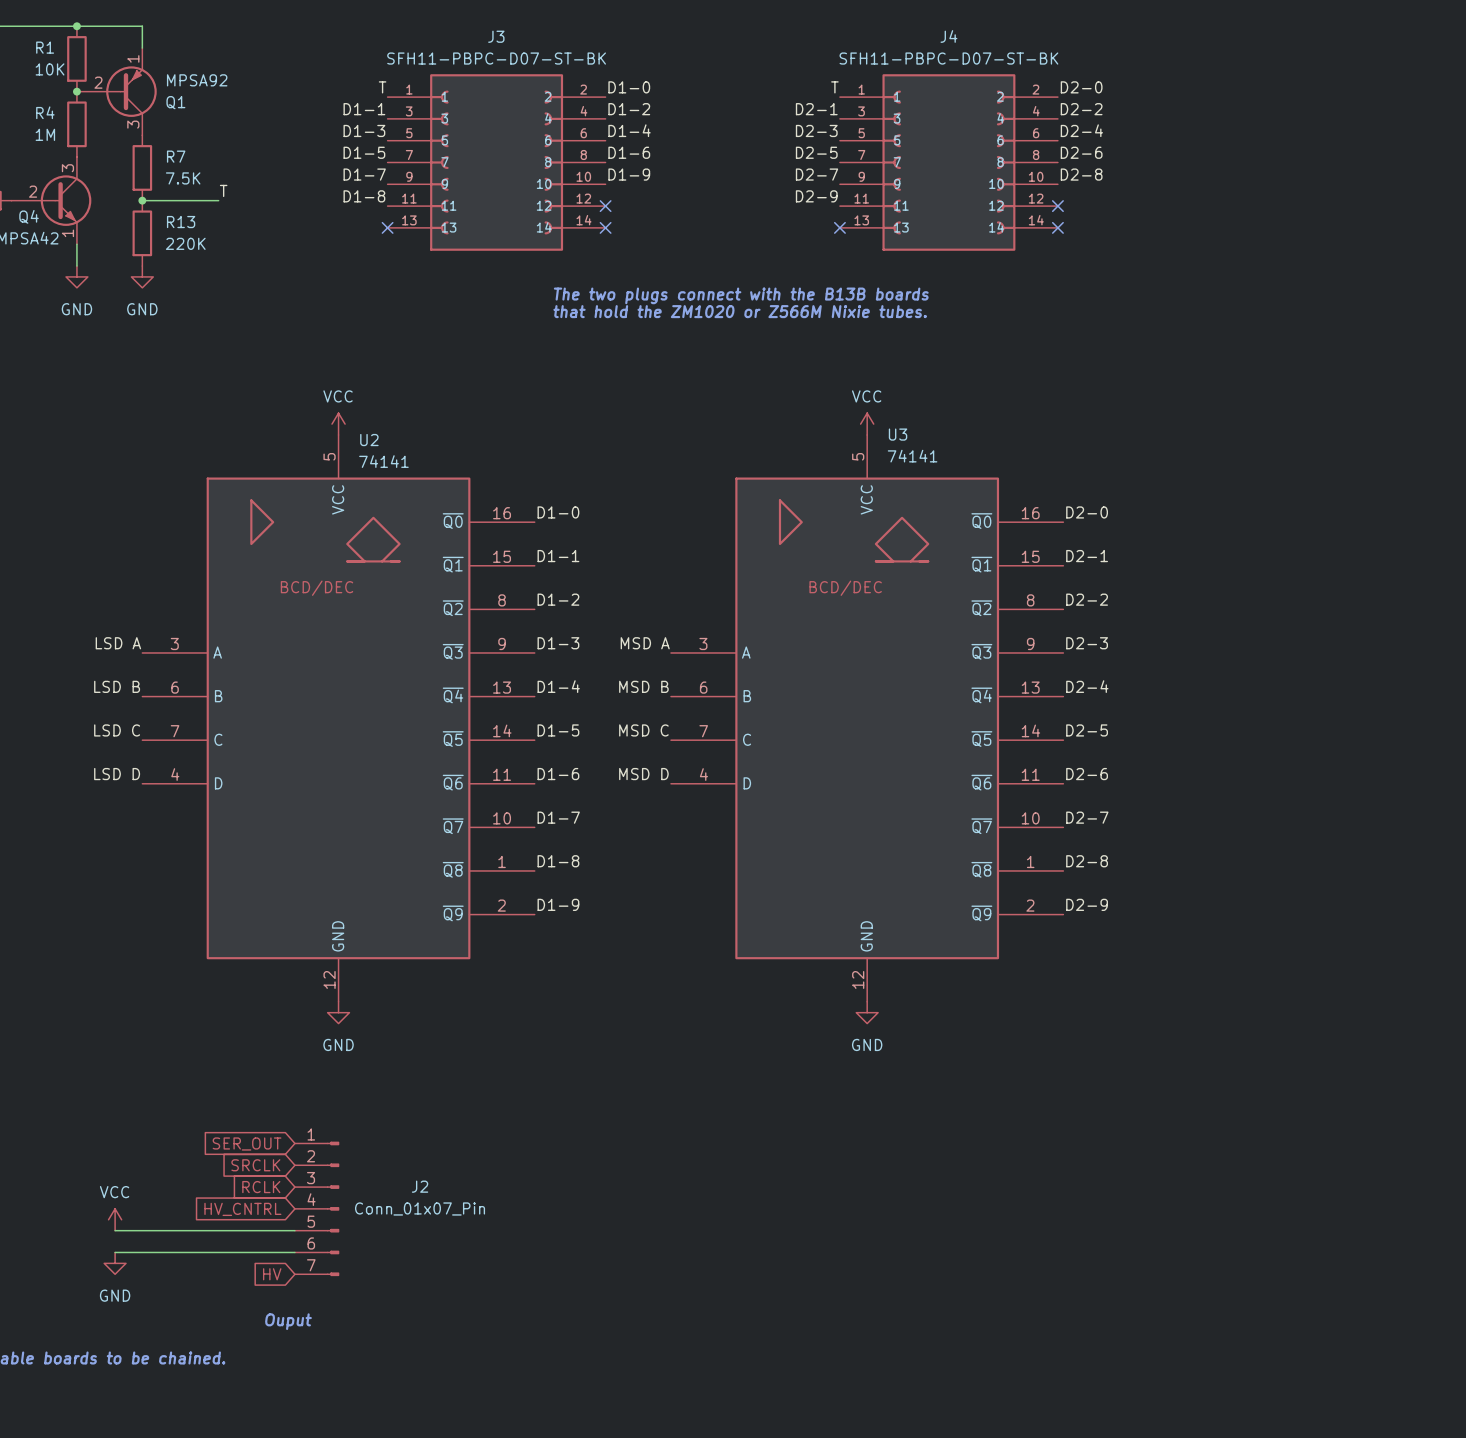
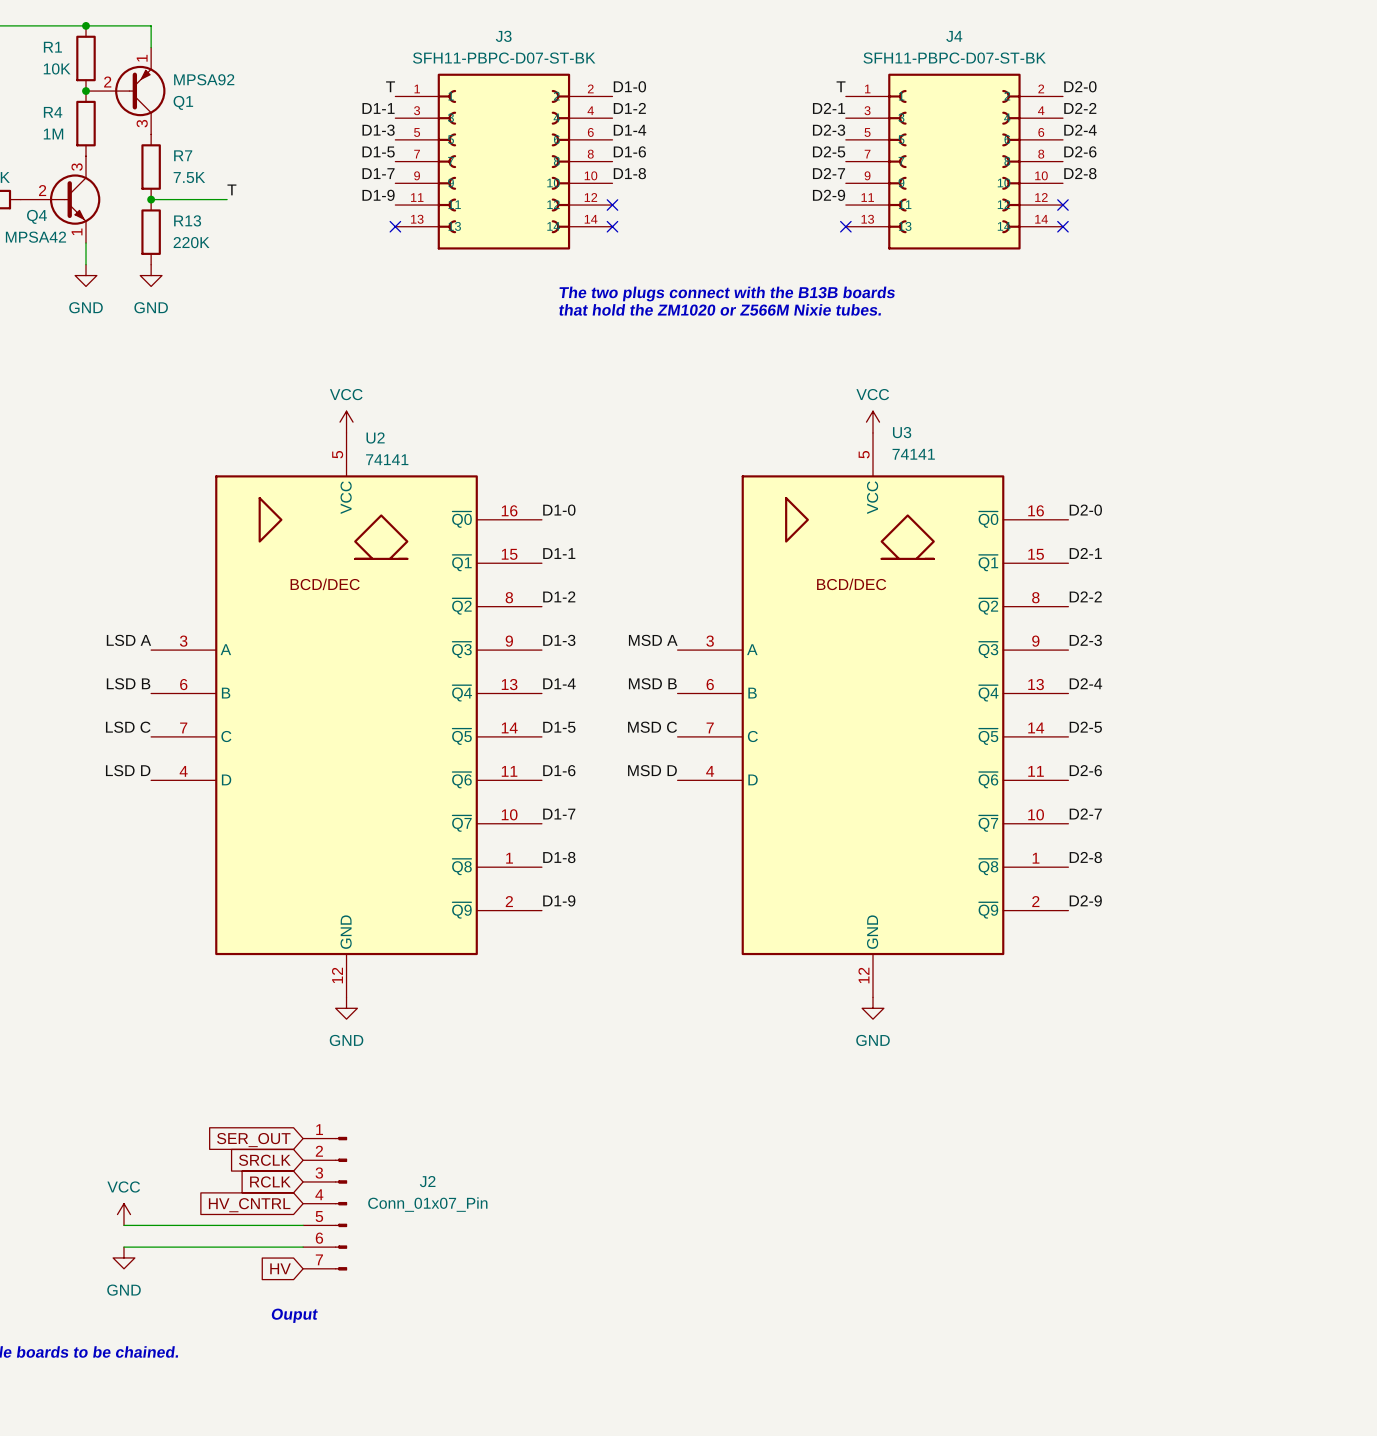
label: D1-9 (629, 174) -> D1-8 (629, 173)
label: D1-8 (364, 196) -> D1-9 (378, 195)

